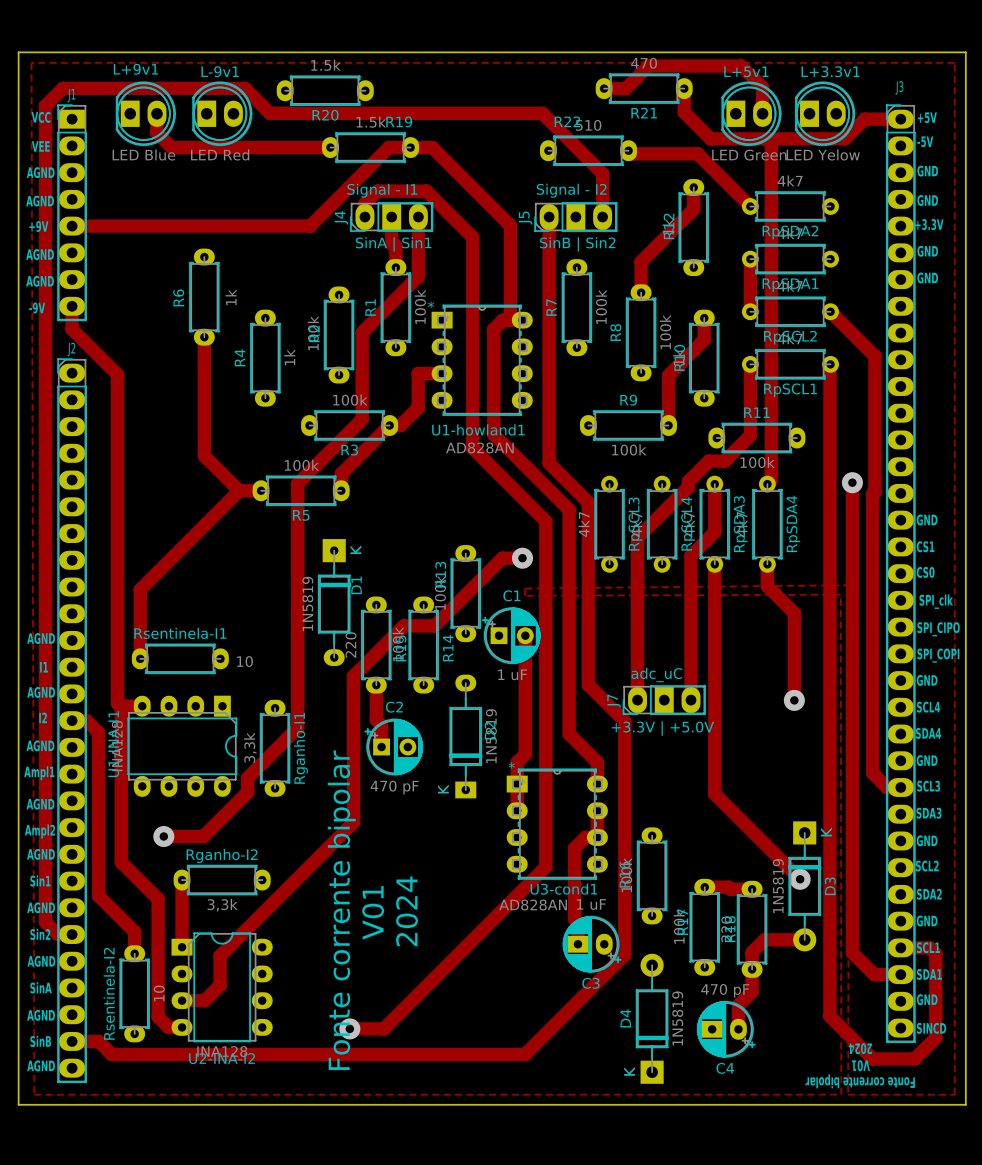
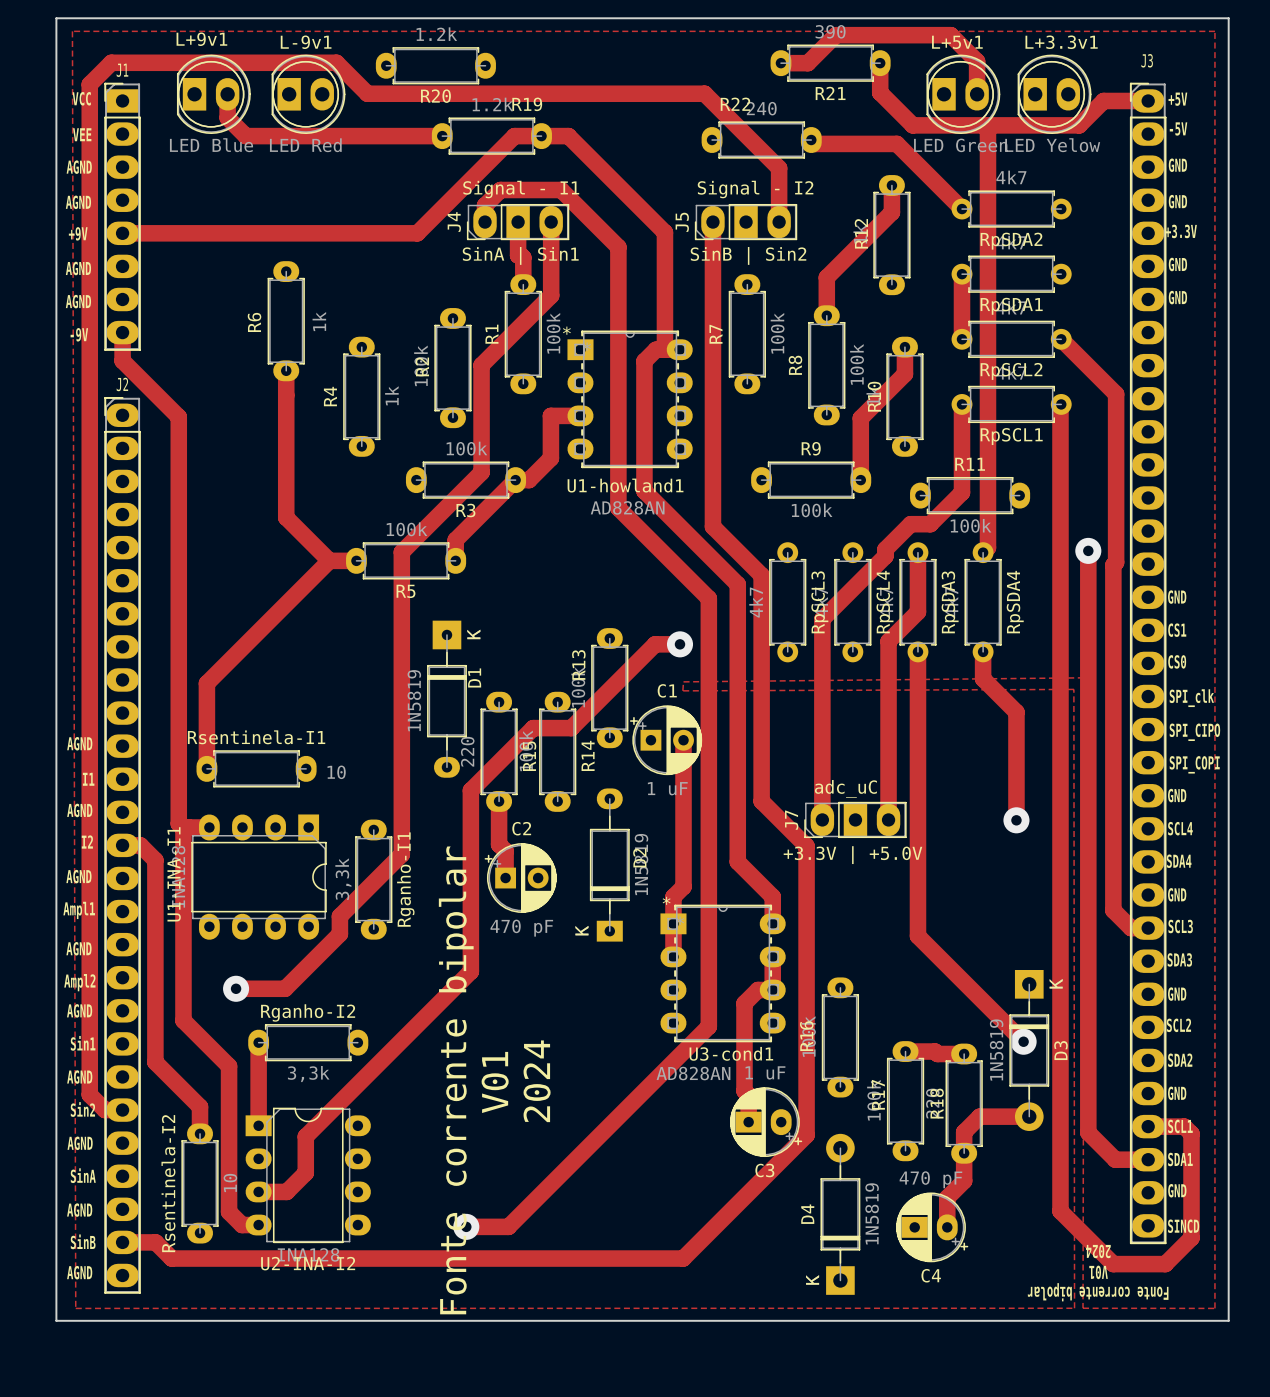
R21 value: 470 (644, 63) -> 390 (830, 31)
R20 value: 1.5k (326, 65) -> 1.2k (436, 34)
R19 value: 1.5k (371, 122) -> 1.2k (492, 104)
R22 value: 510 (588, 125) -> 240 (761, 108)

